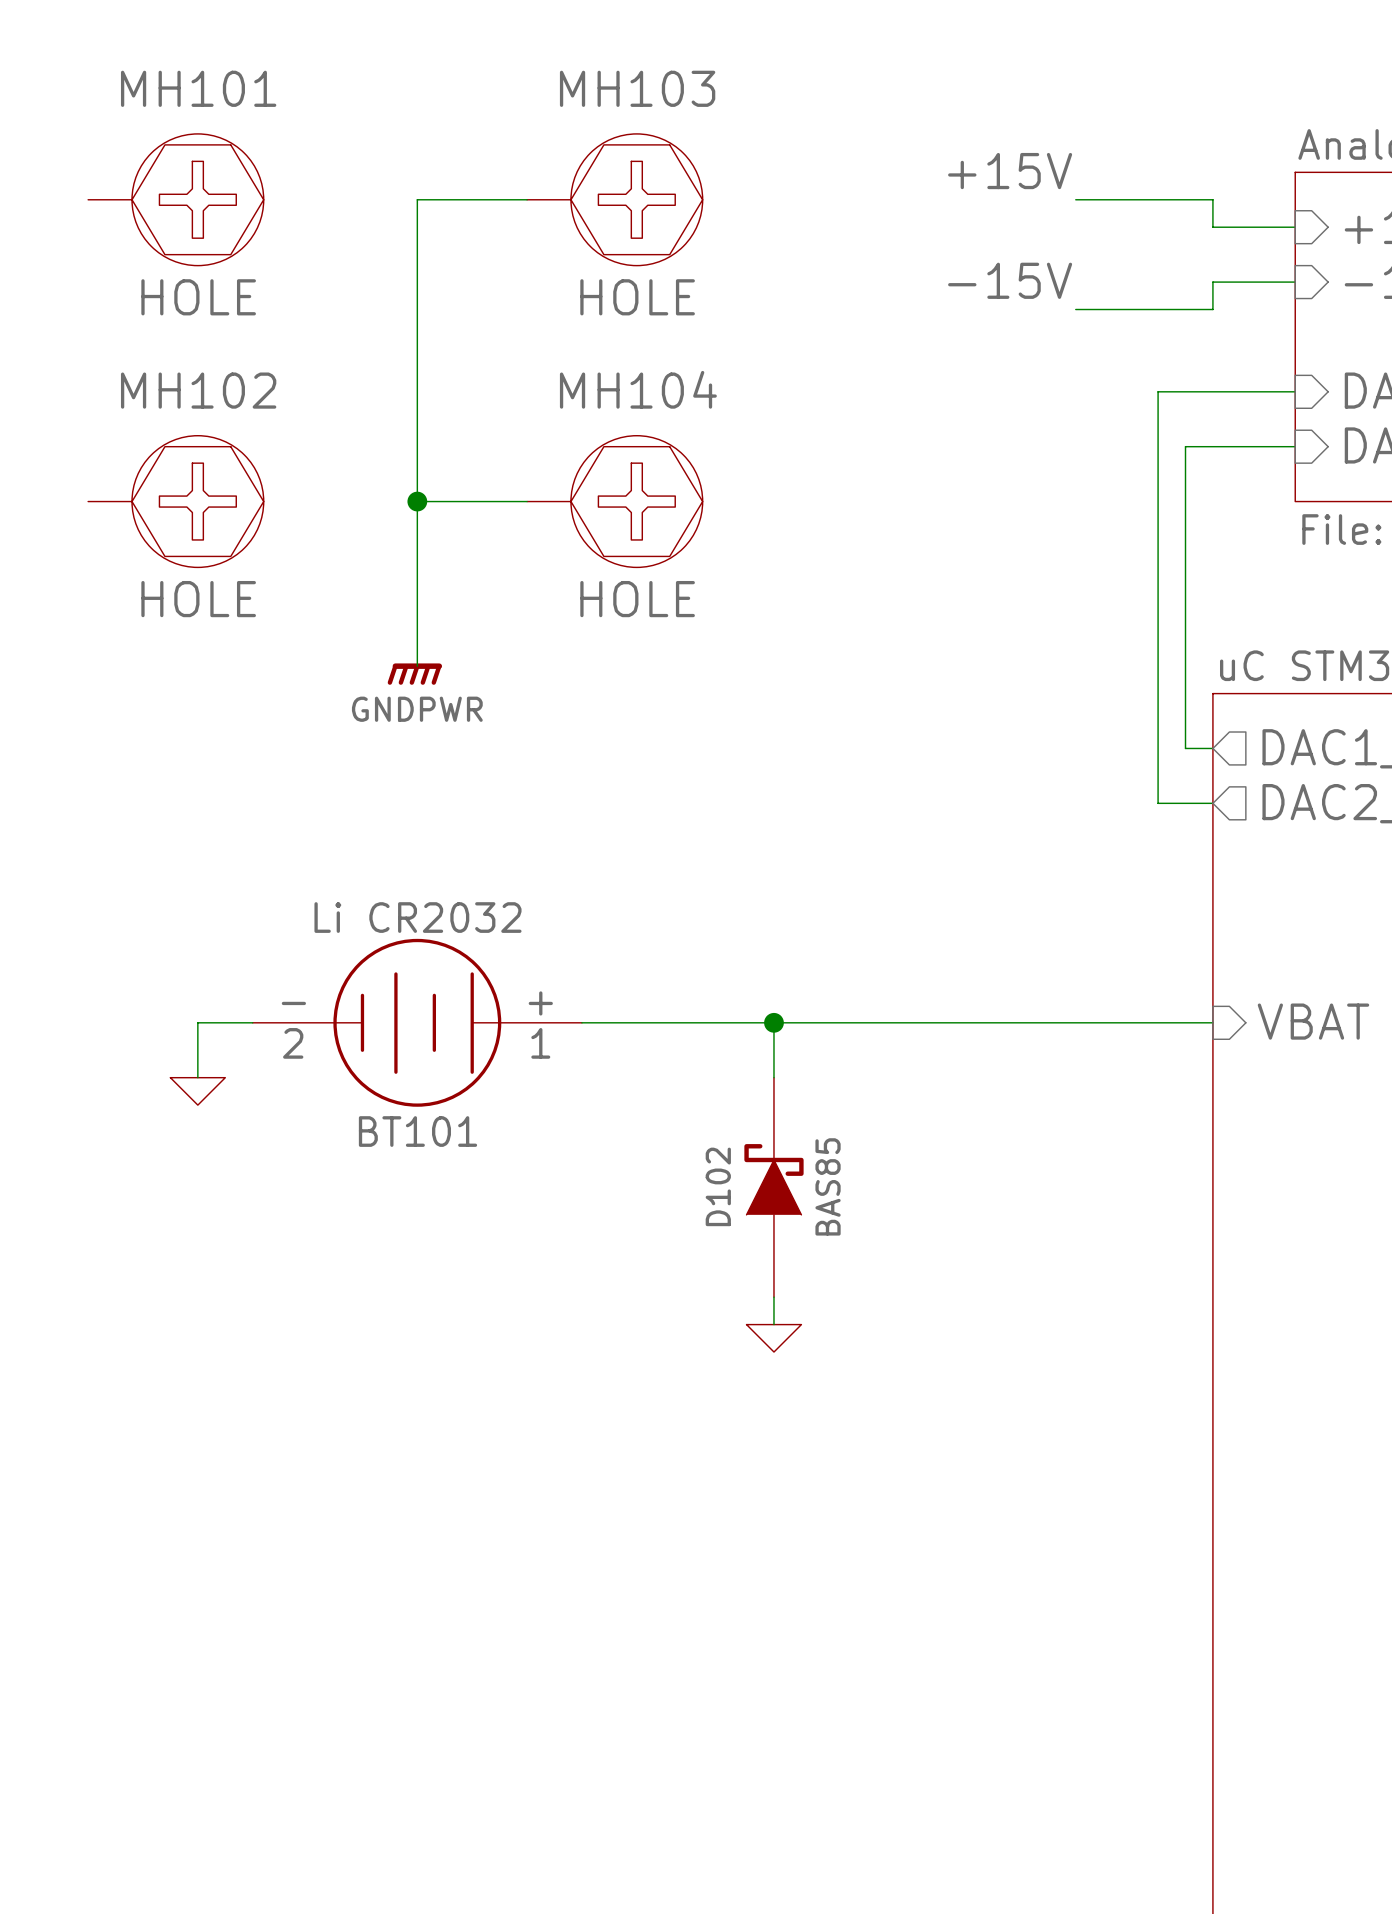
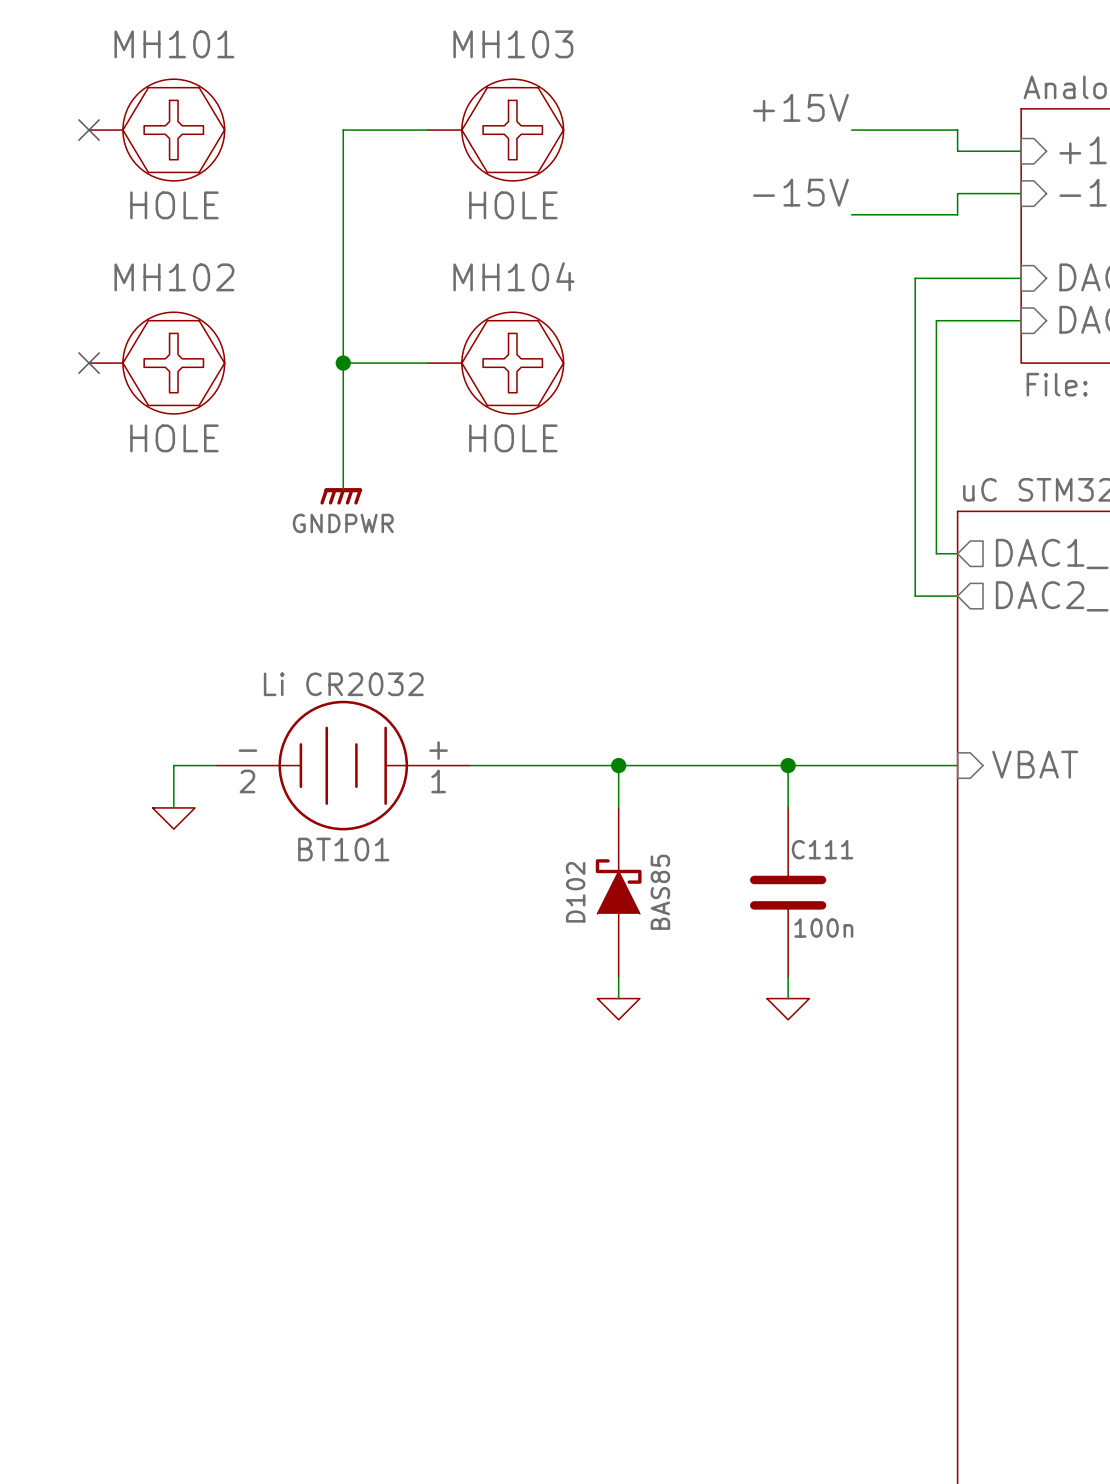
no-connect mark: none -> (89, 130)
no-connect mark: none -> (89, 363)
wire: none -> (788, 765) (788, 807)
junction: none -> (788, 765)
C111: none -> 100n (788, 892)
wire: none -> (788, 977) (788, 998)
power symbol: none -> (788, 1009)

